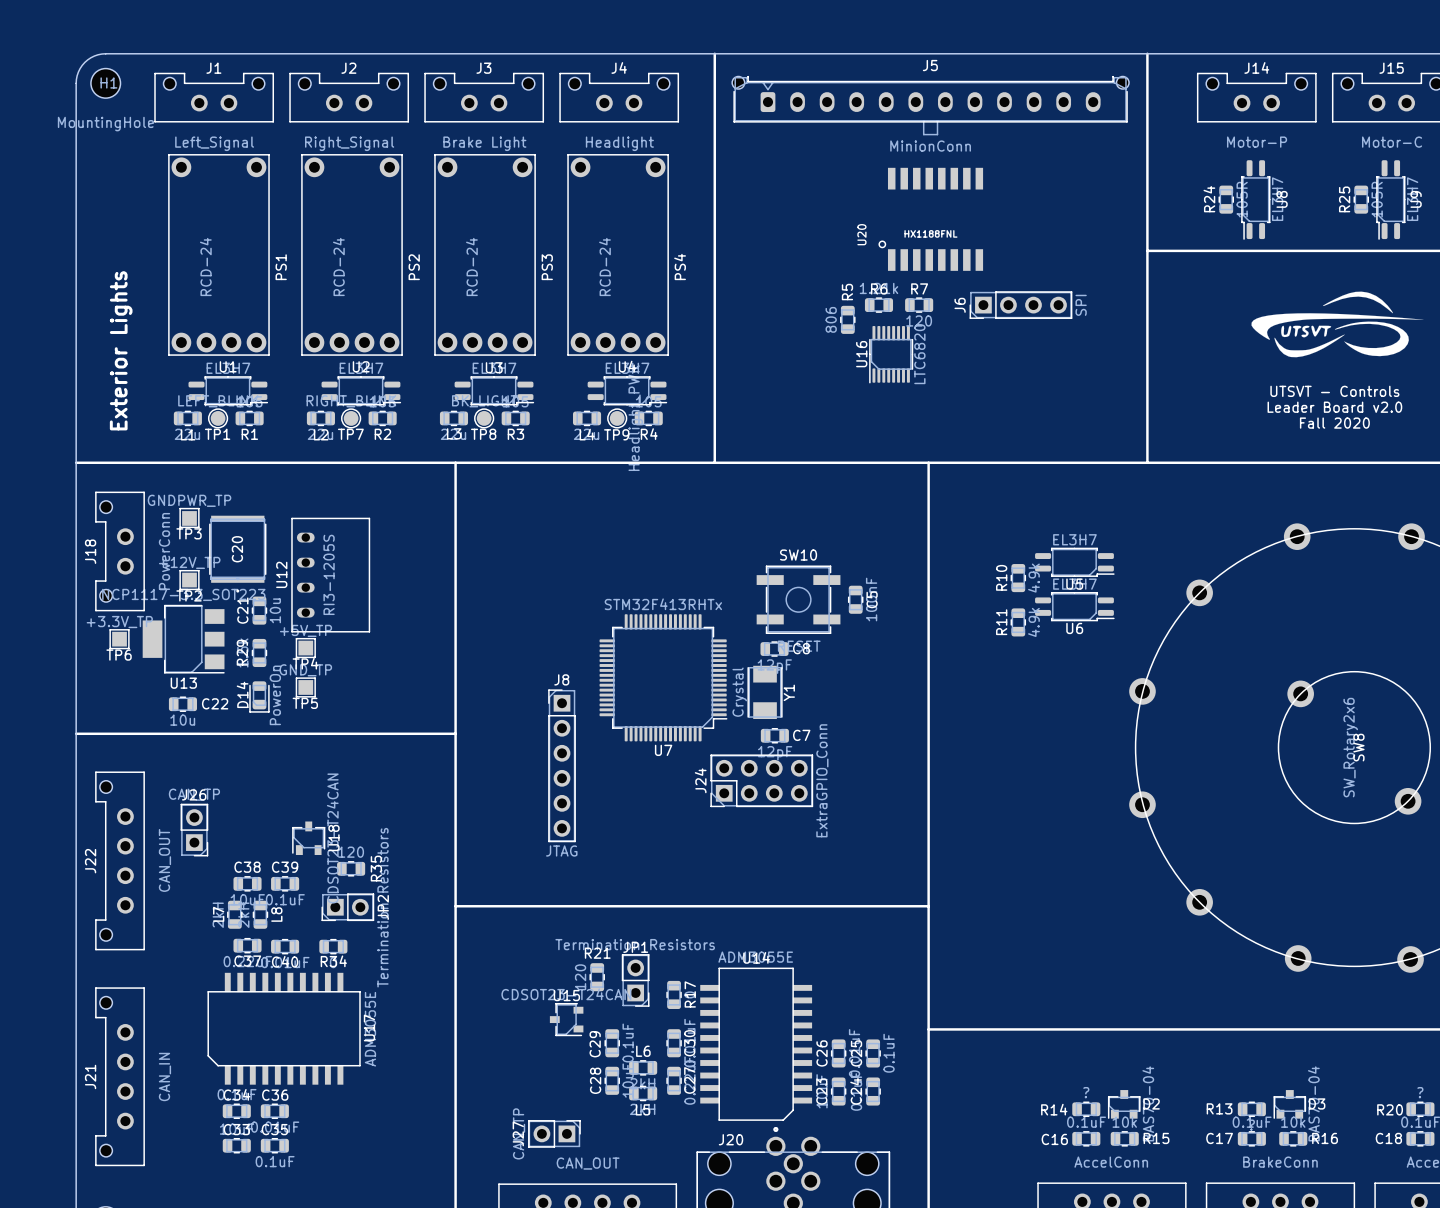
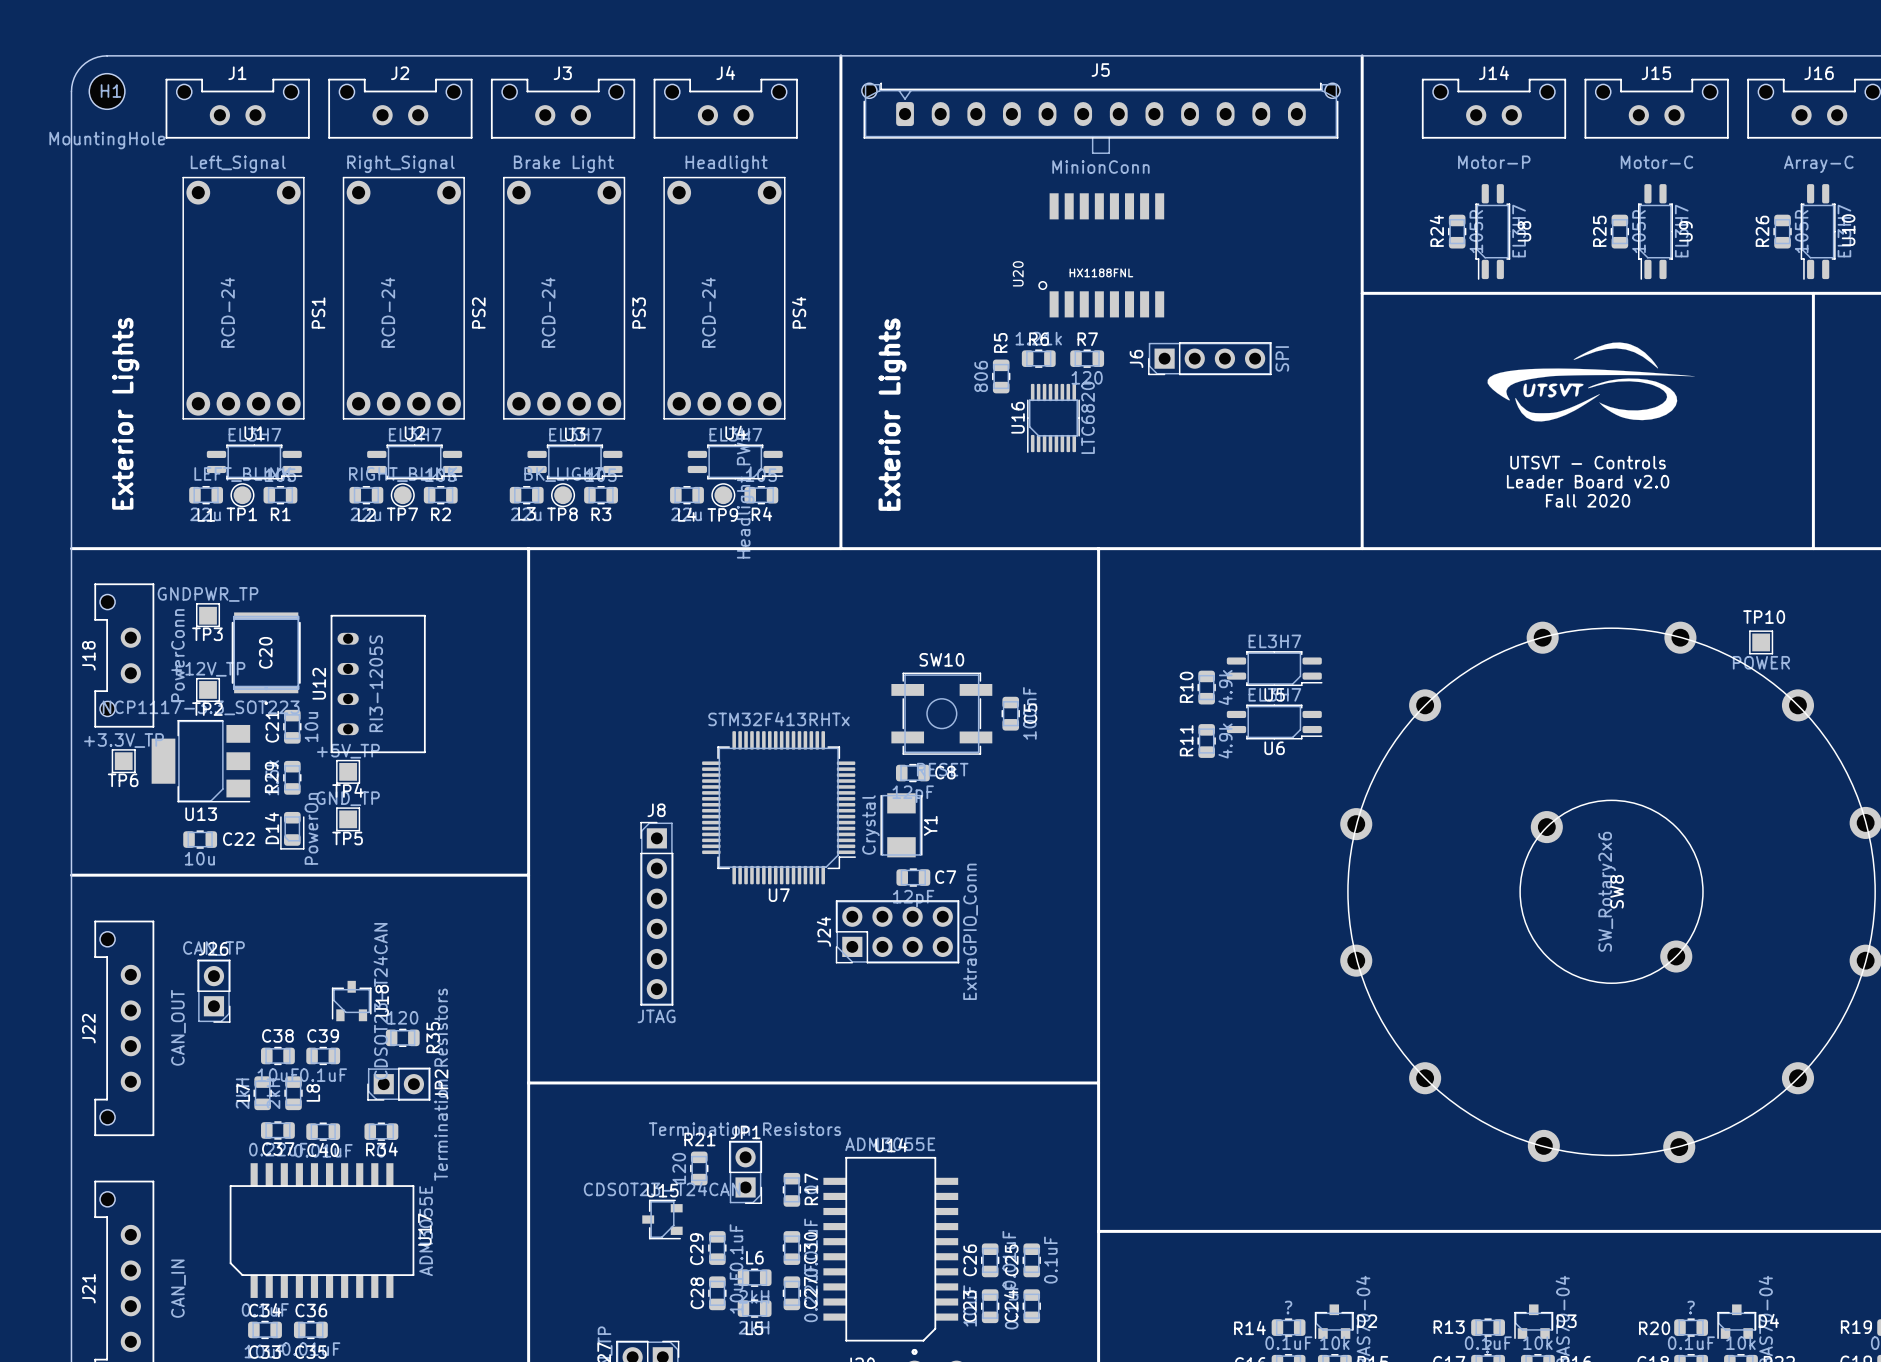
text: none -> Exterior Lights (892, 414)

